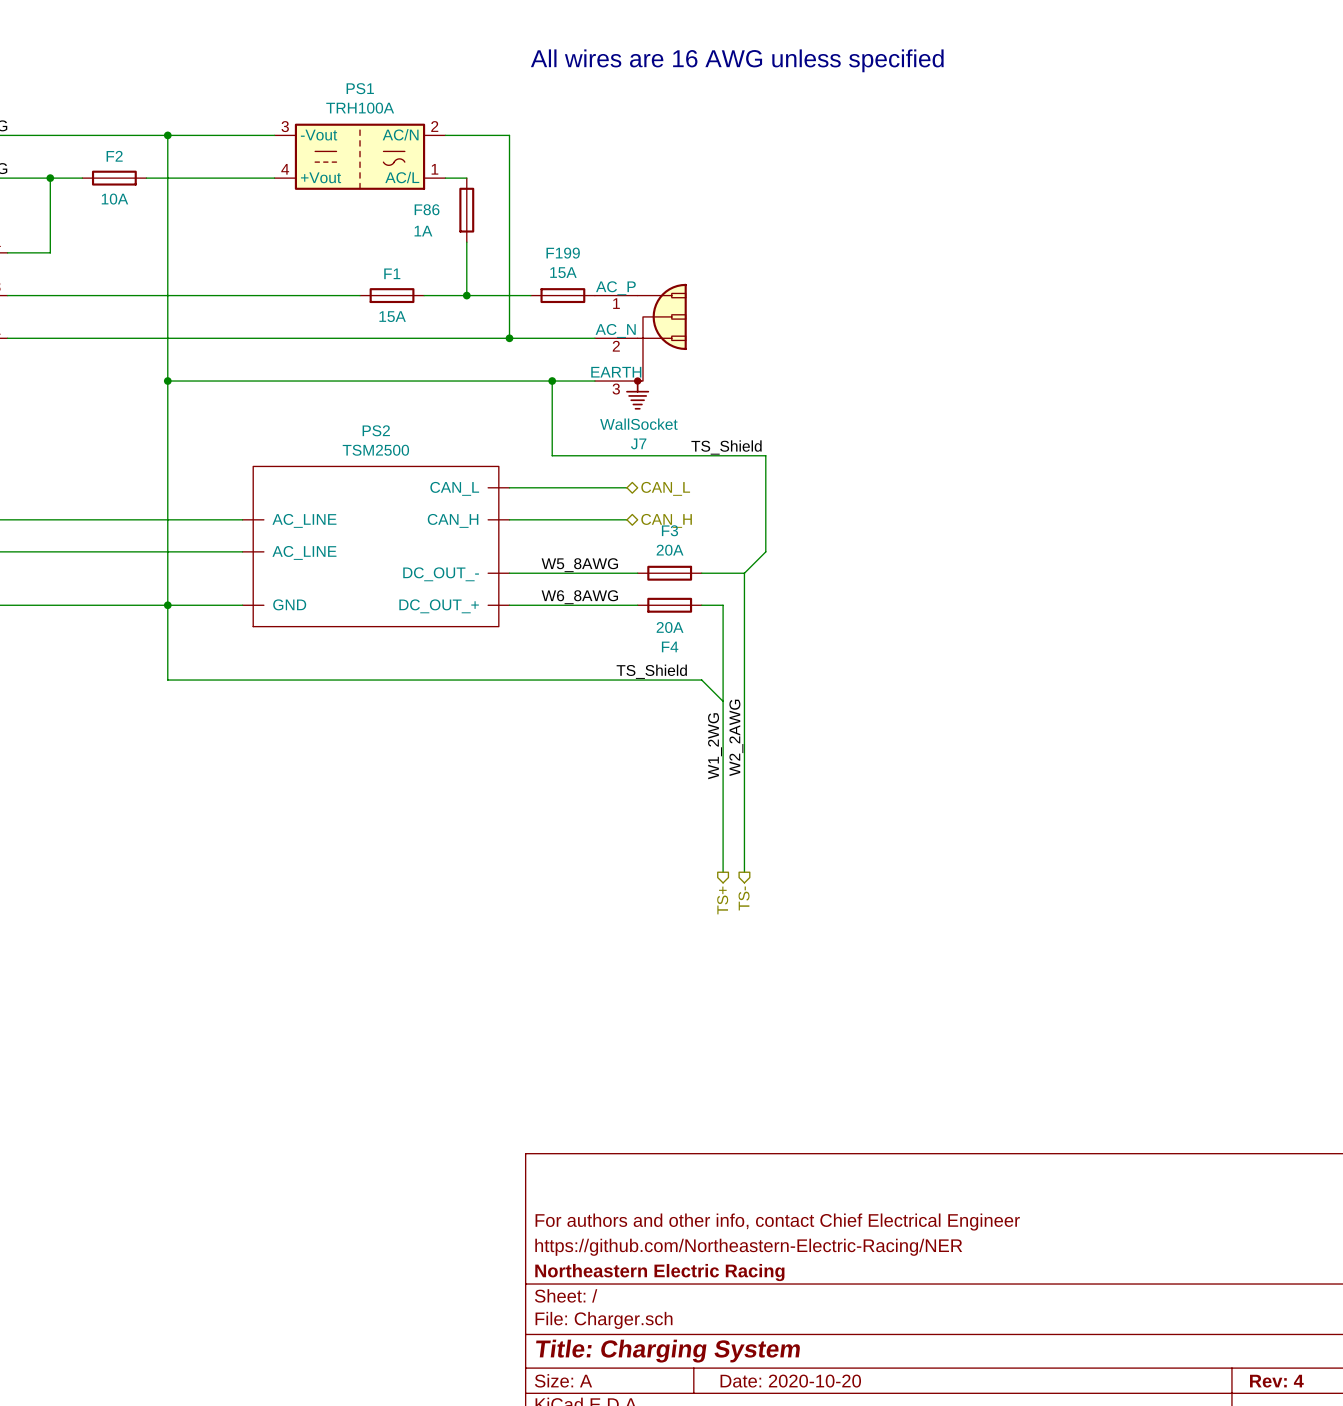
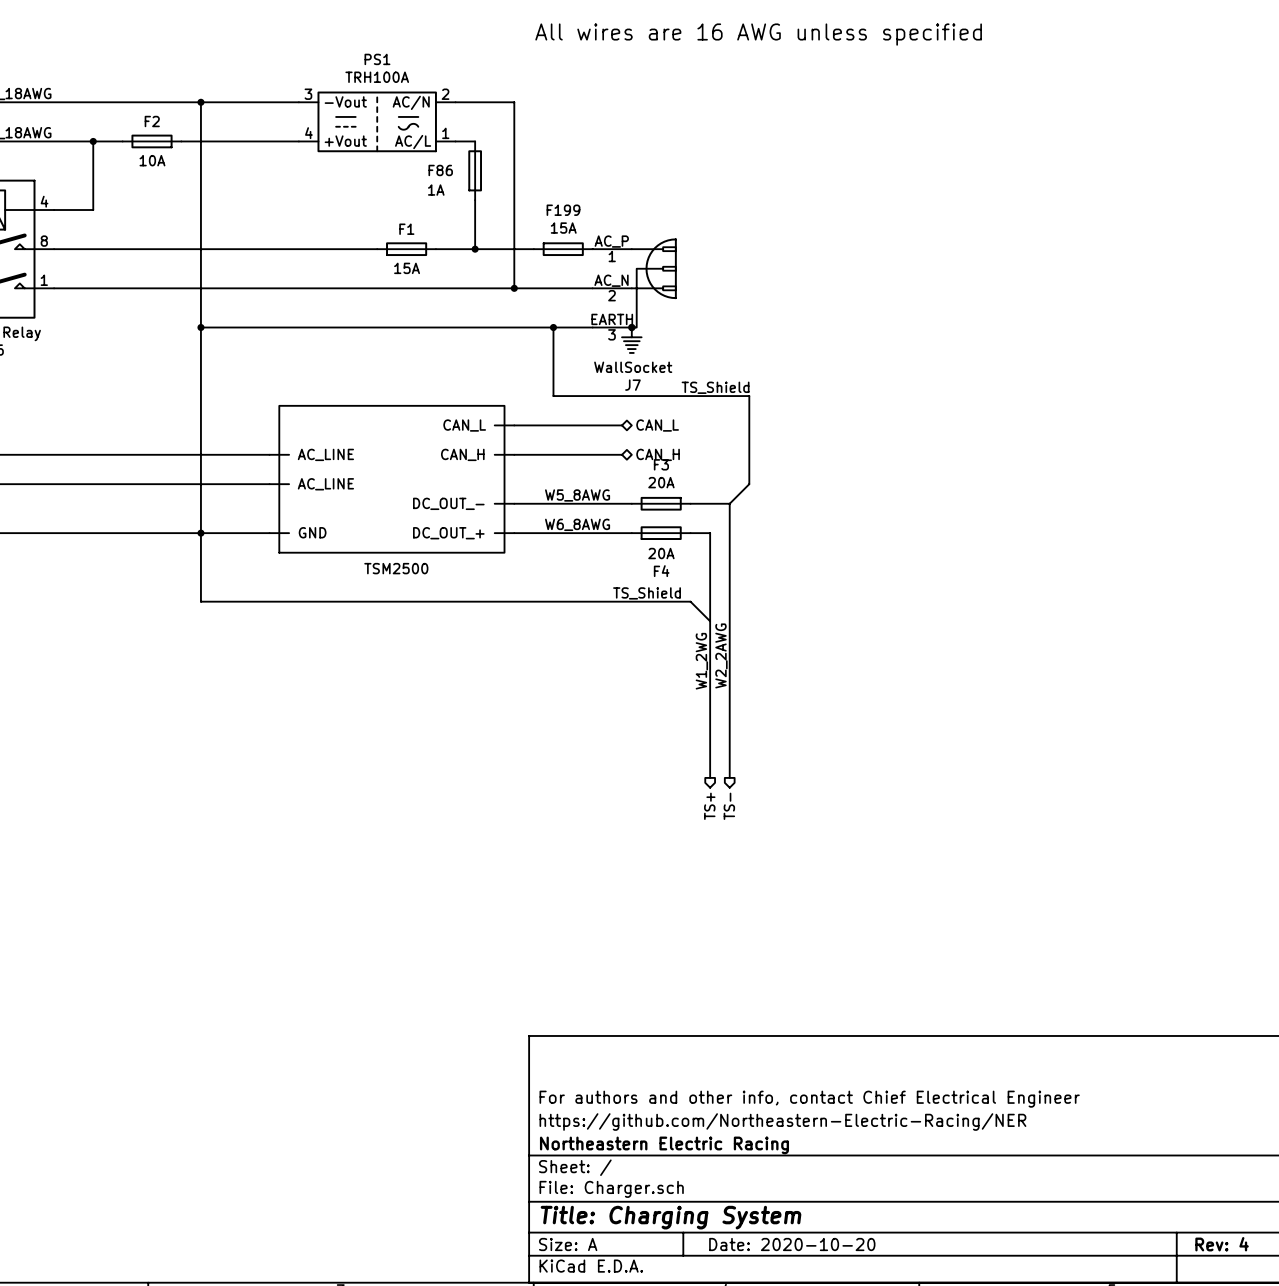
PS2 name: PS2 (376, 430) -> none
PS2 value position: TSM2500 (375, 450) -> TSM2500 (396, 568)

